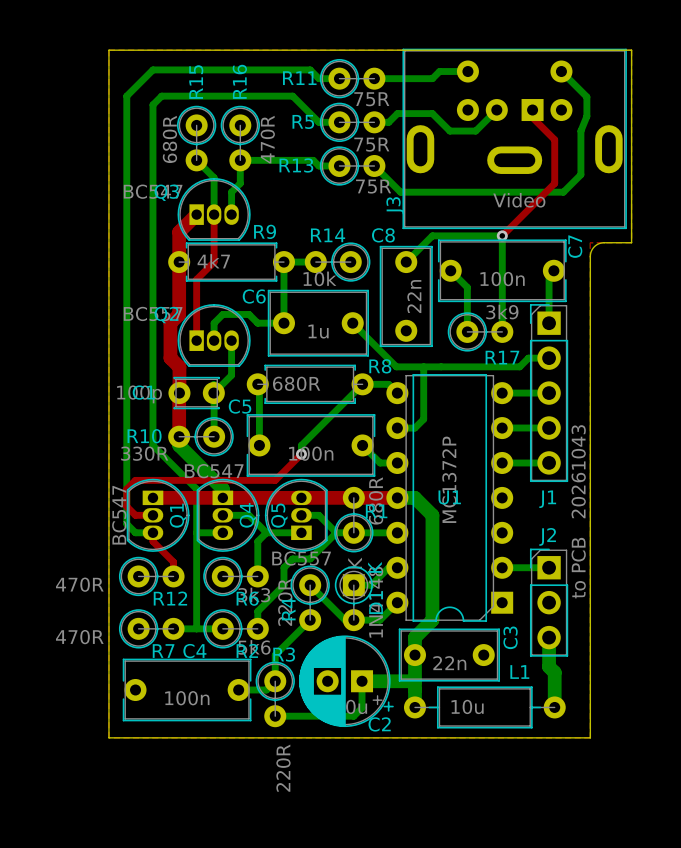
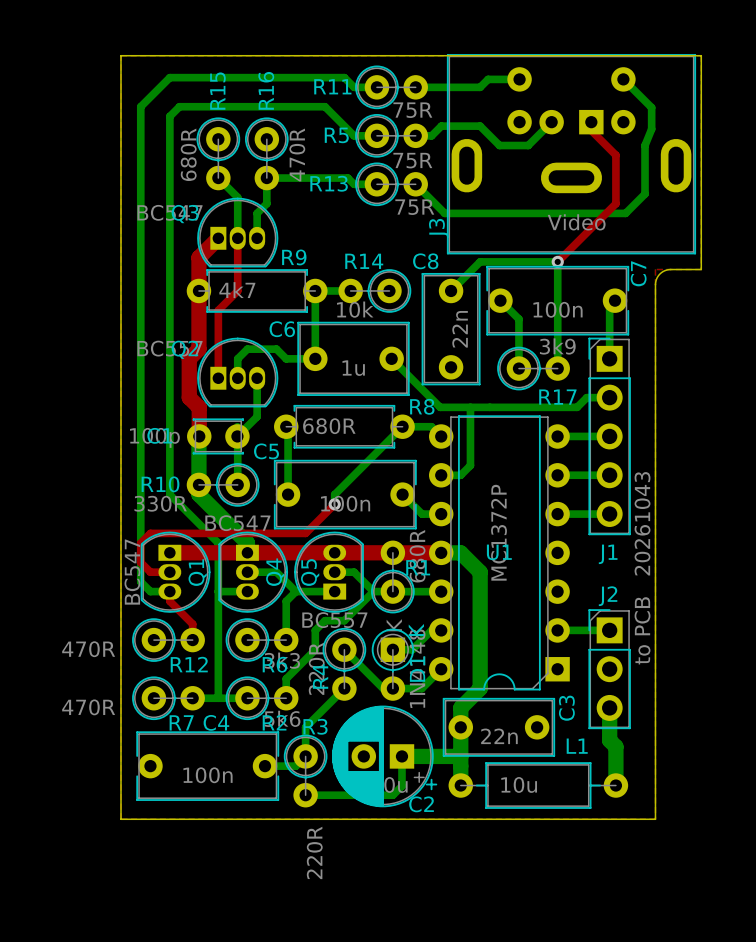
top track: (179, 393) (179, 436) -> none
bottom track: none -> (198, 436) (198, 484)

